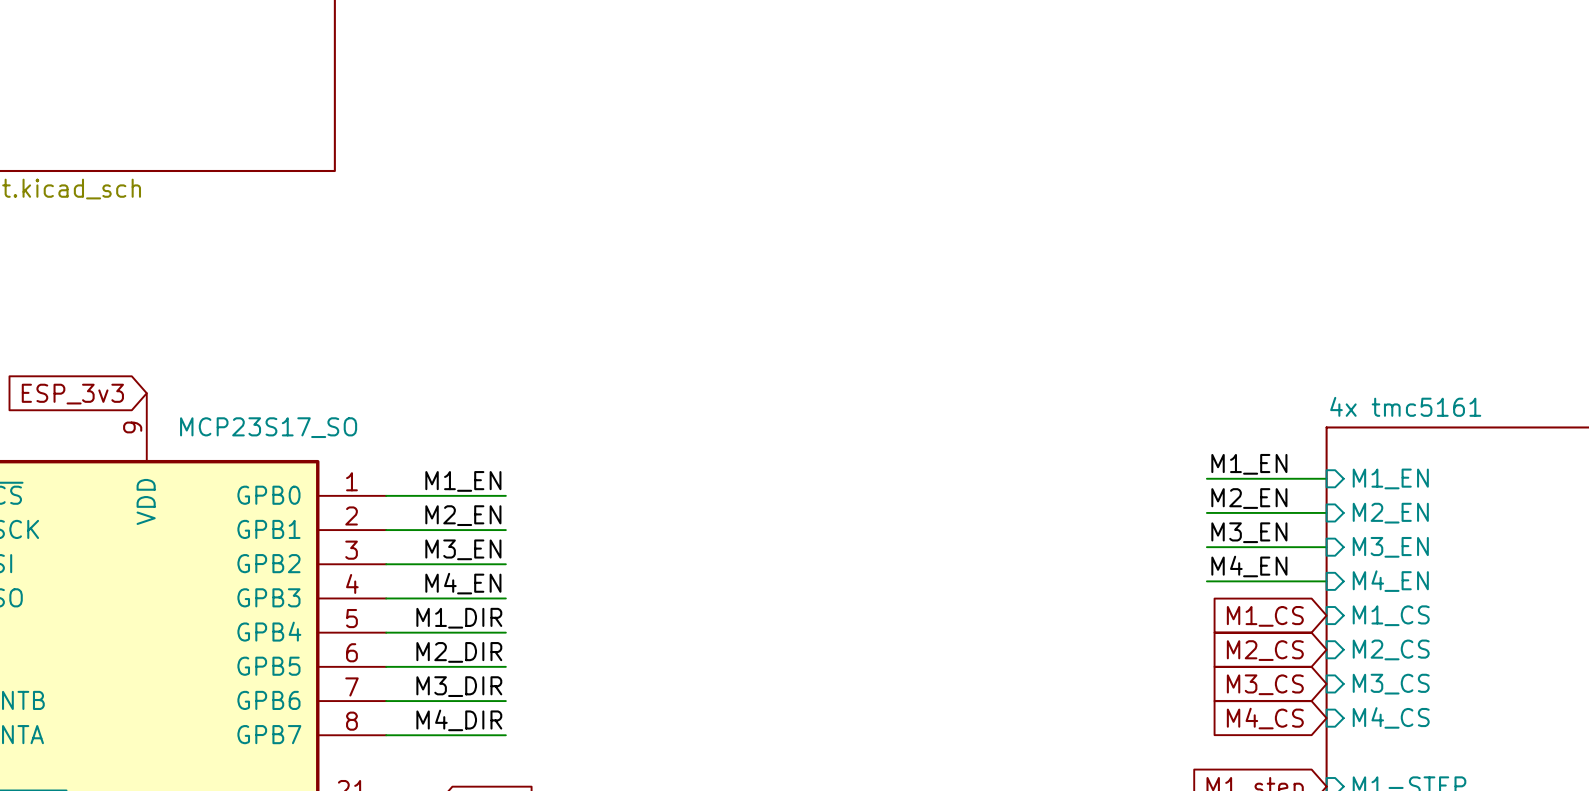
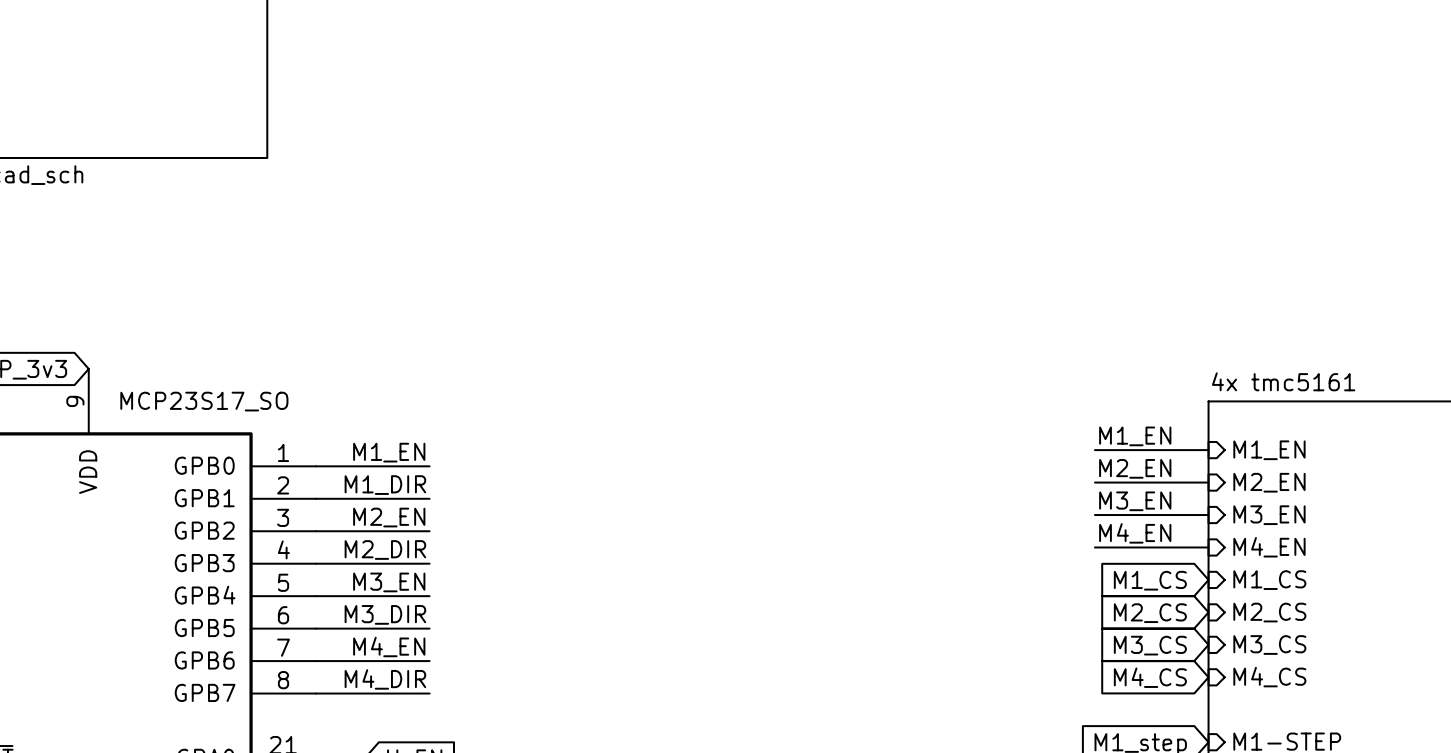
label: M2_EN (463, 515) -> M1_DIR (385, 485)
label: M3_EN (463, 549) -> M2_EN (389, 517)
label: M4_EN (463, 583) -> M2_DIR (385, 549)
label: M1_DIR (459, 618) -> M3_EN (389, 582)
label: M2_DIR (459, 652) -> M3_DIR (385, 614)
label: M3_DIR (459, 686) -> M4_EN (389, 646)

